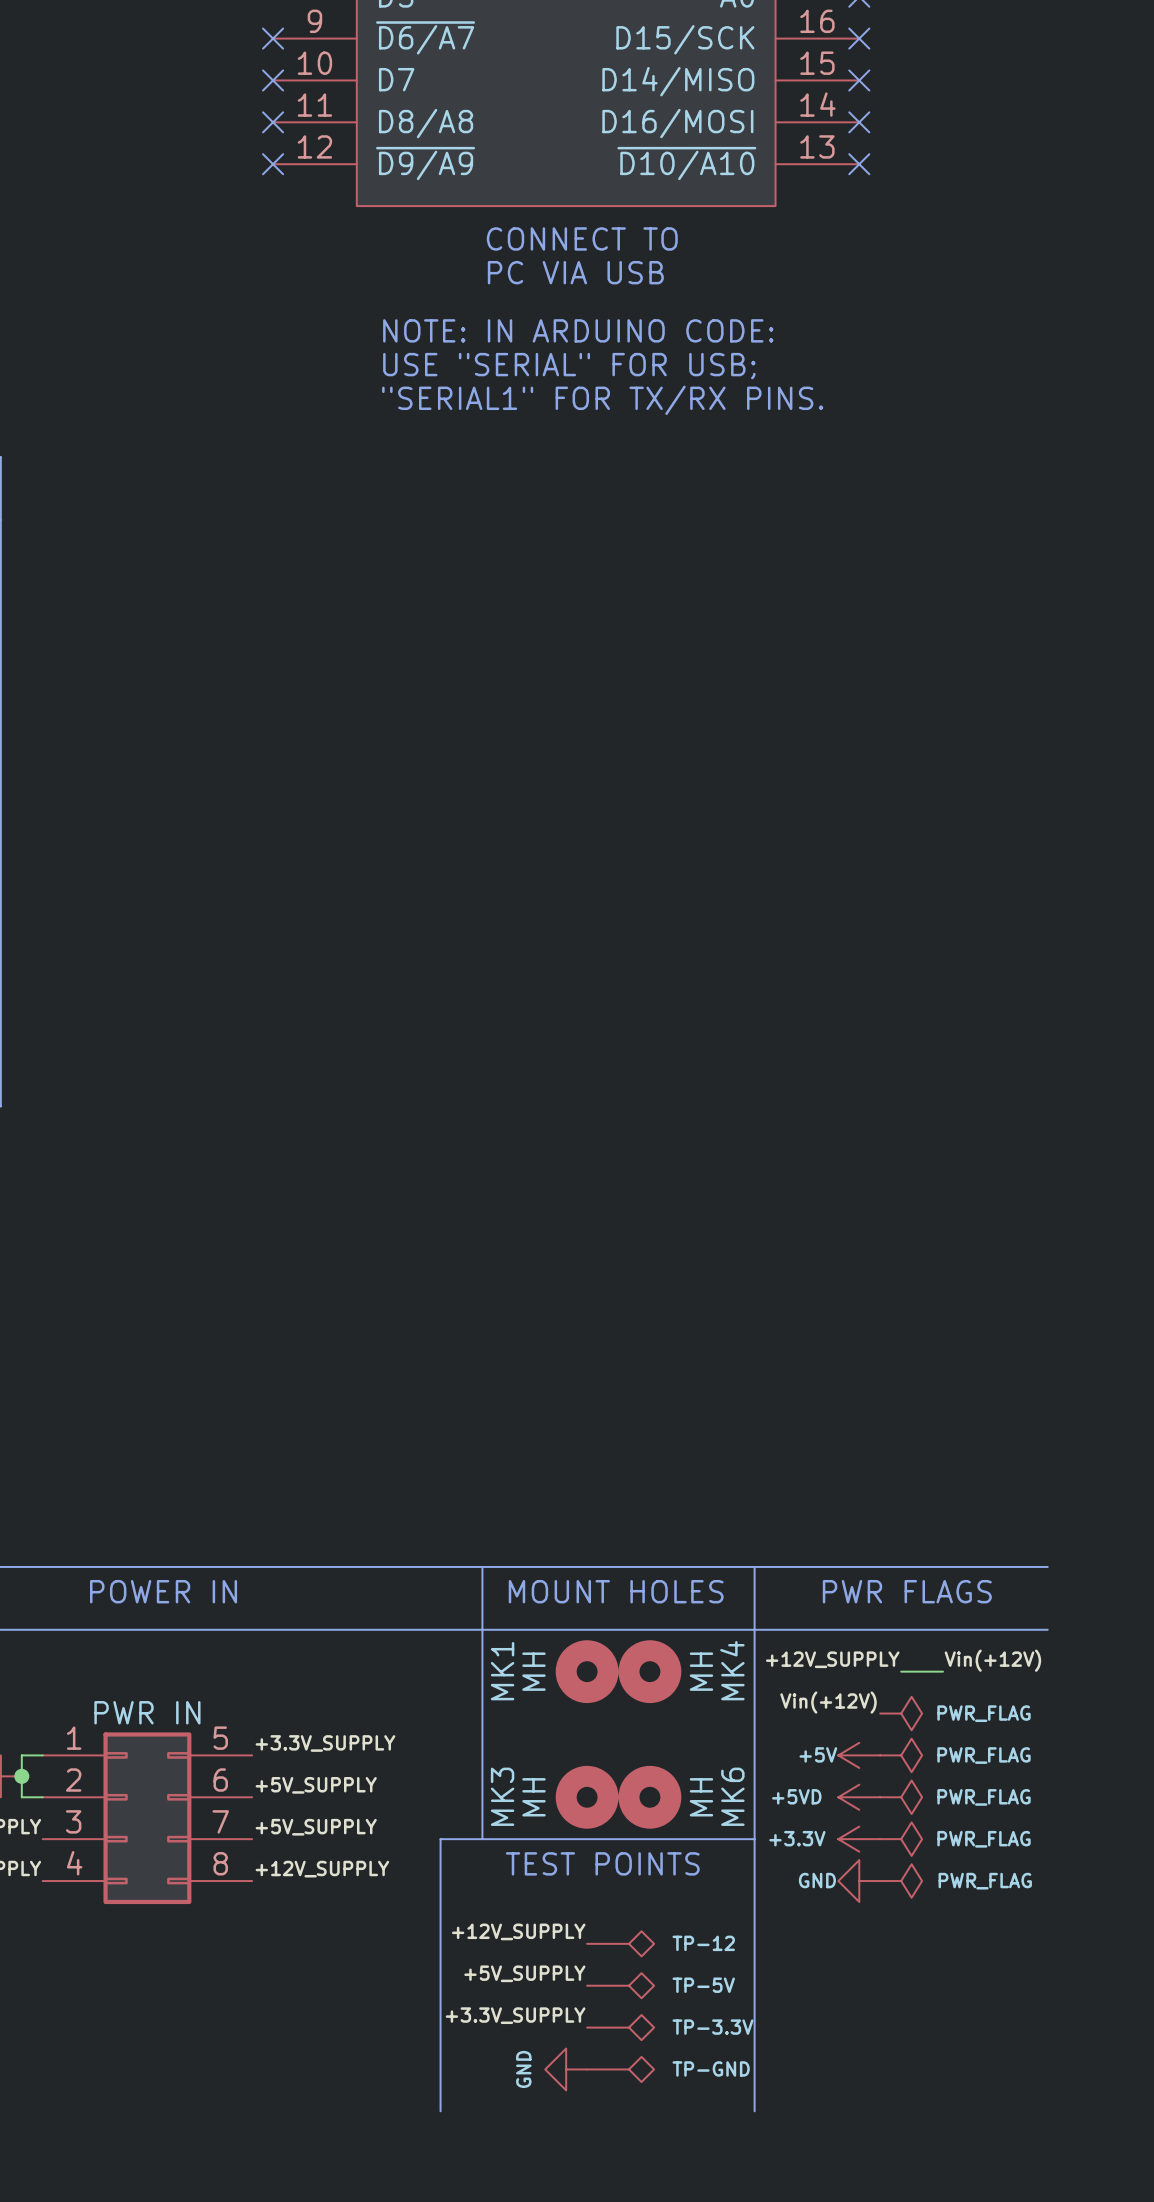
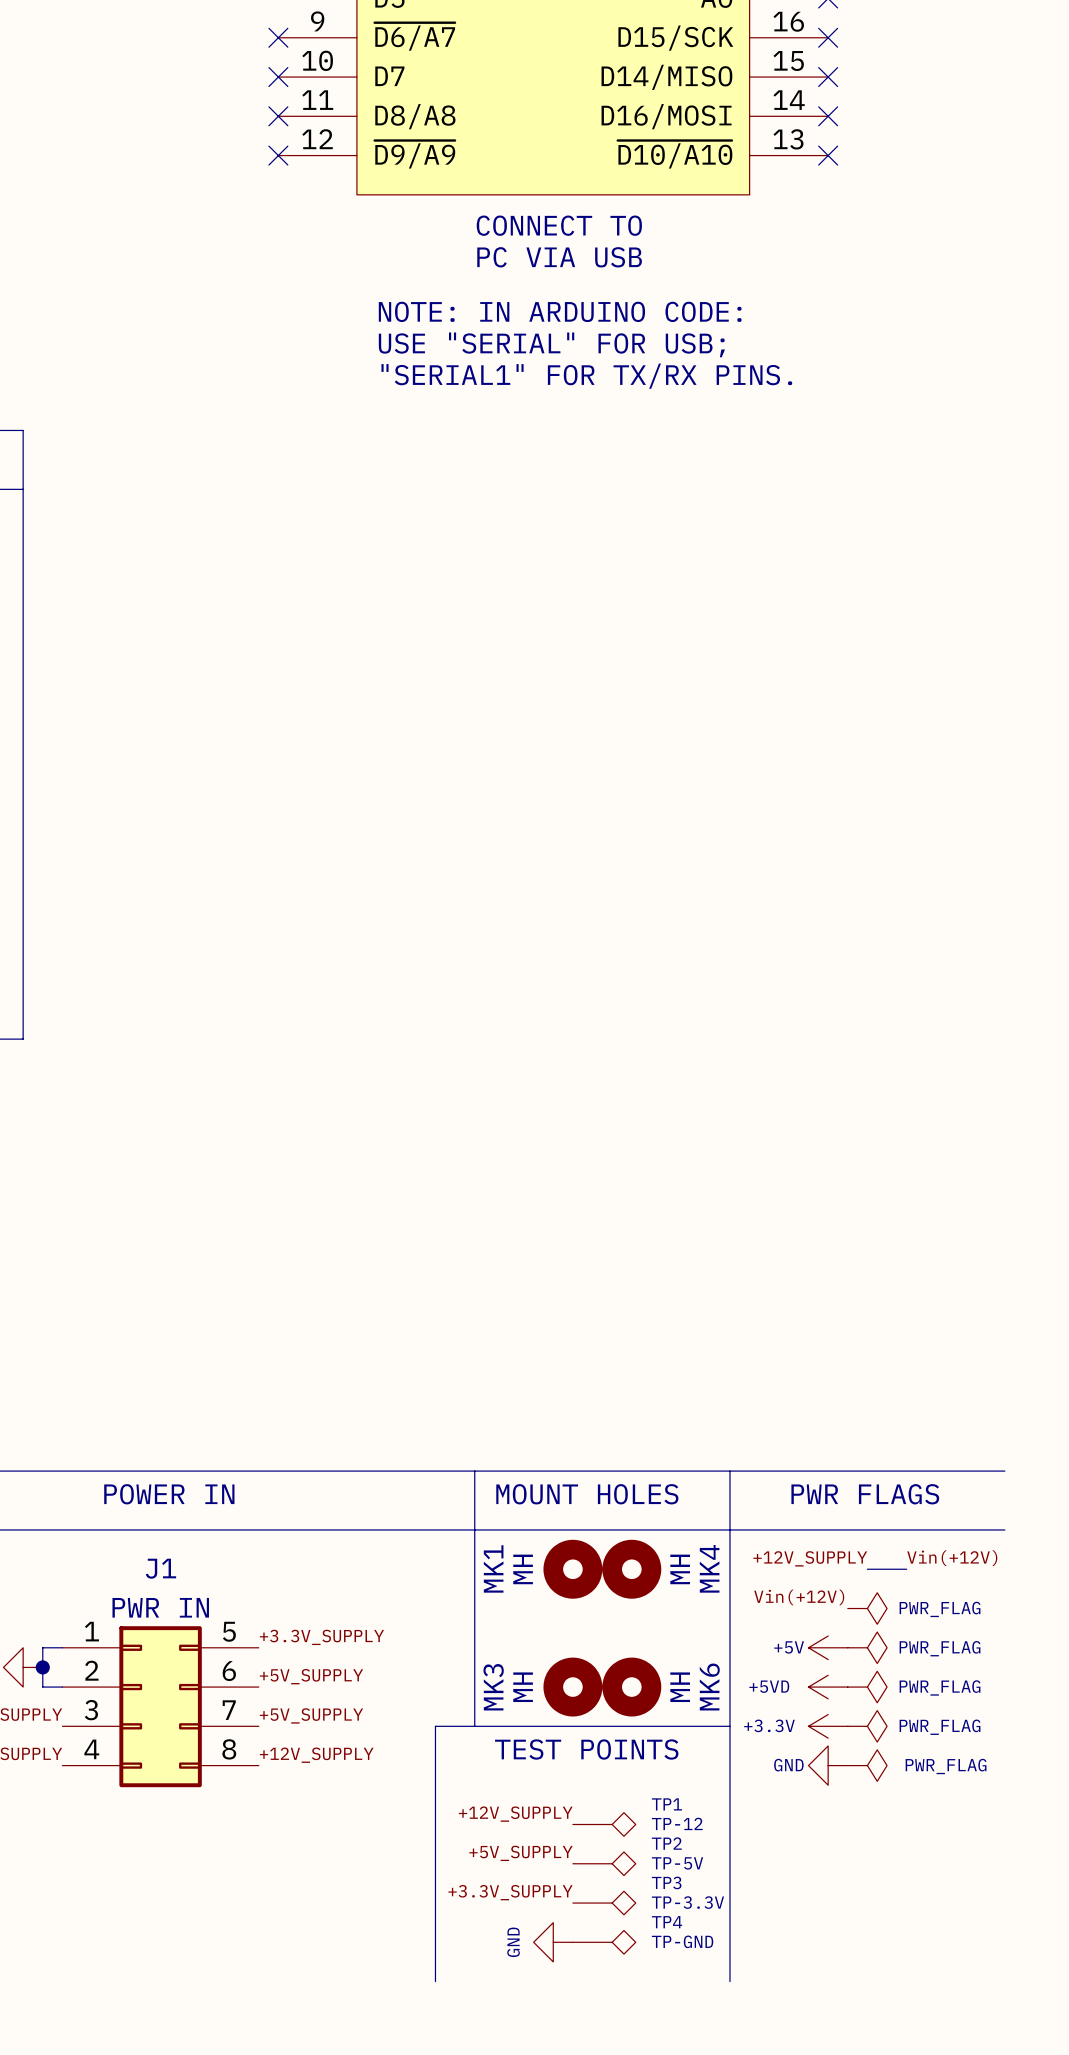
J1 name: none -> J1 (160, 1568)
TP1 name: none -> TP1 (666, 1804)
TP2 name: none -> TP2 (666, 1843)
TP3 name: none -> TP3 (666, 1882)
TP4 name: none -> TP4 (667, 1922)

